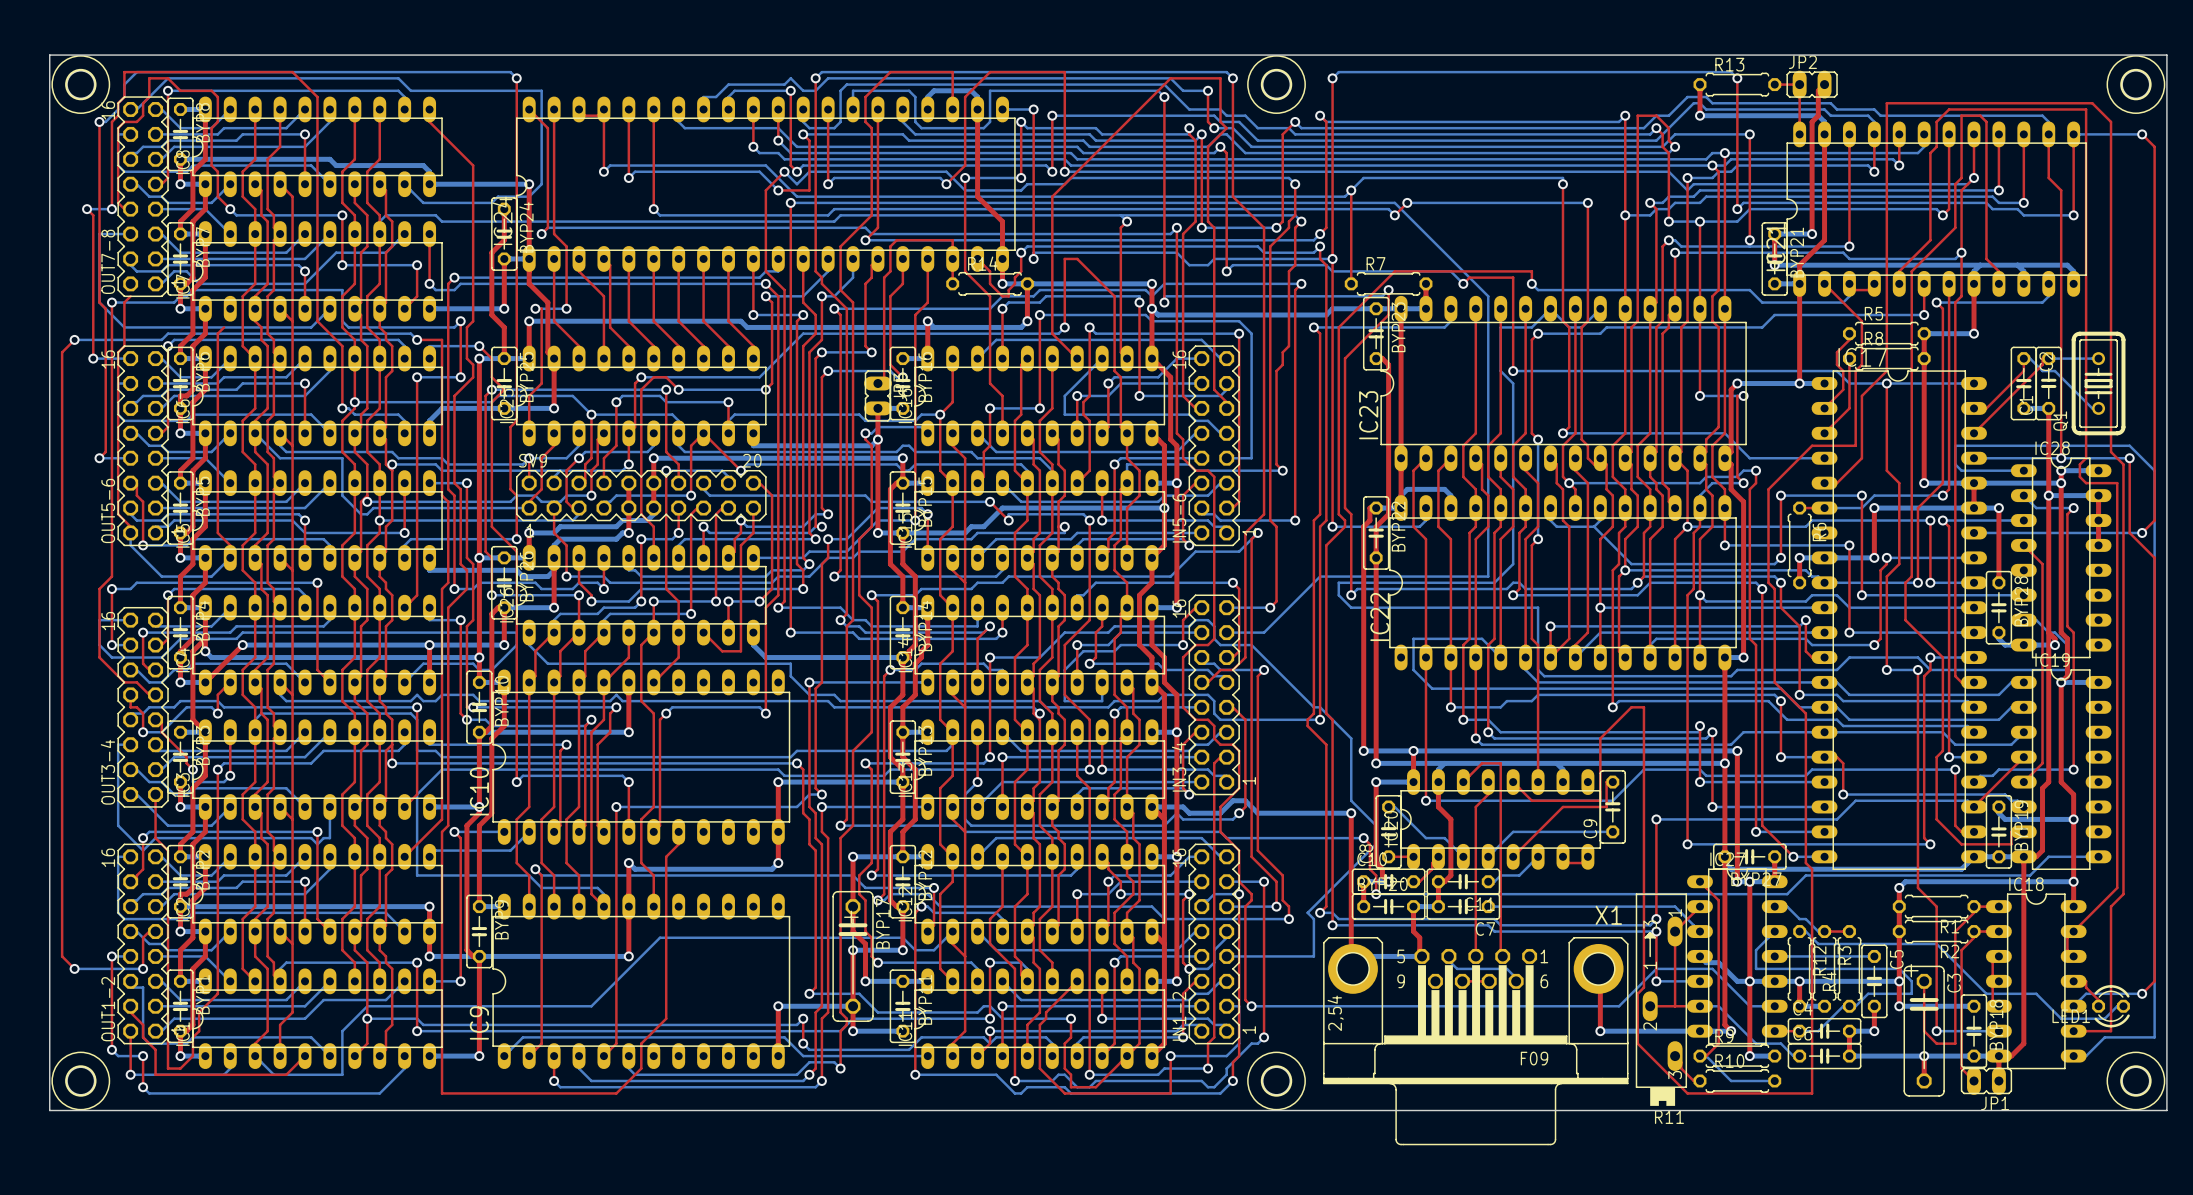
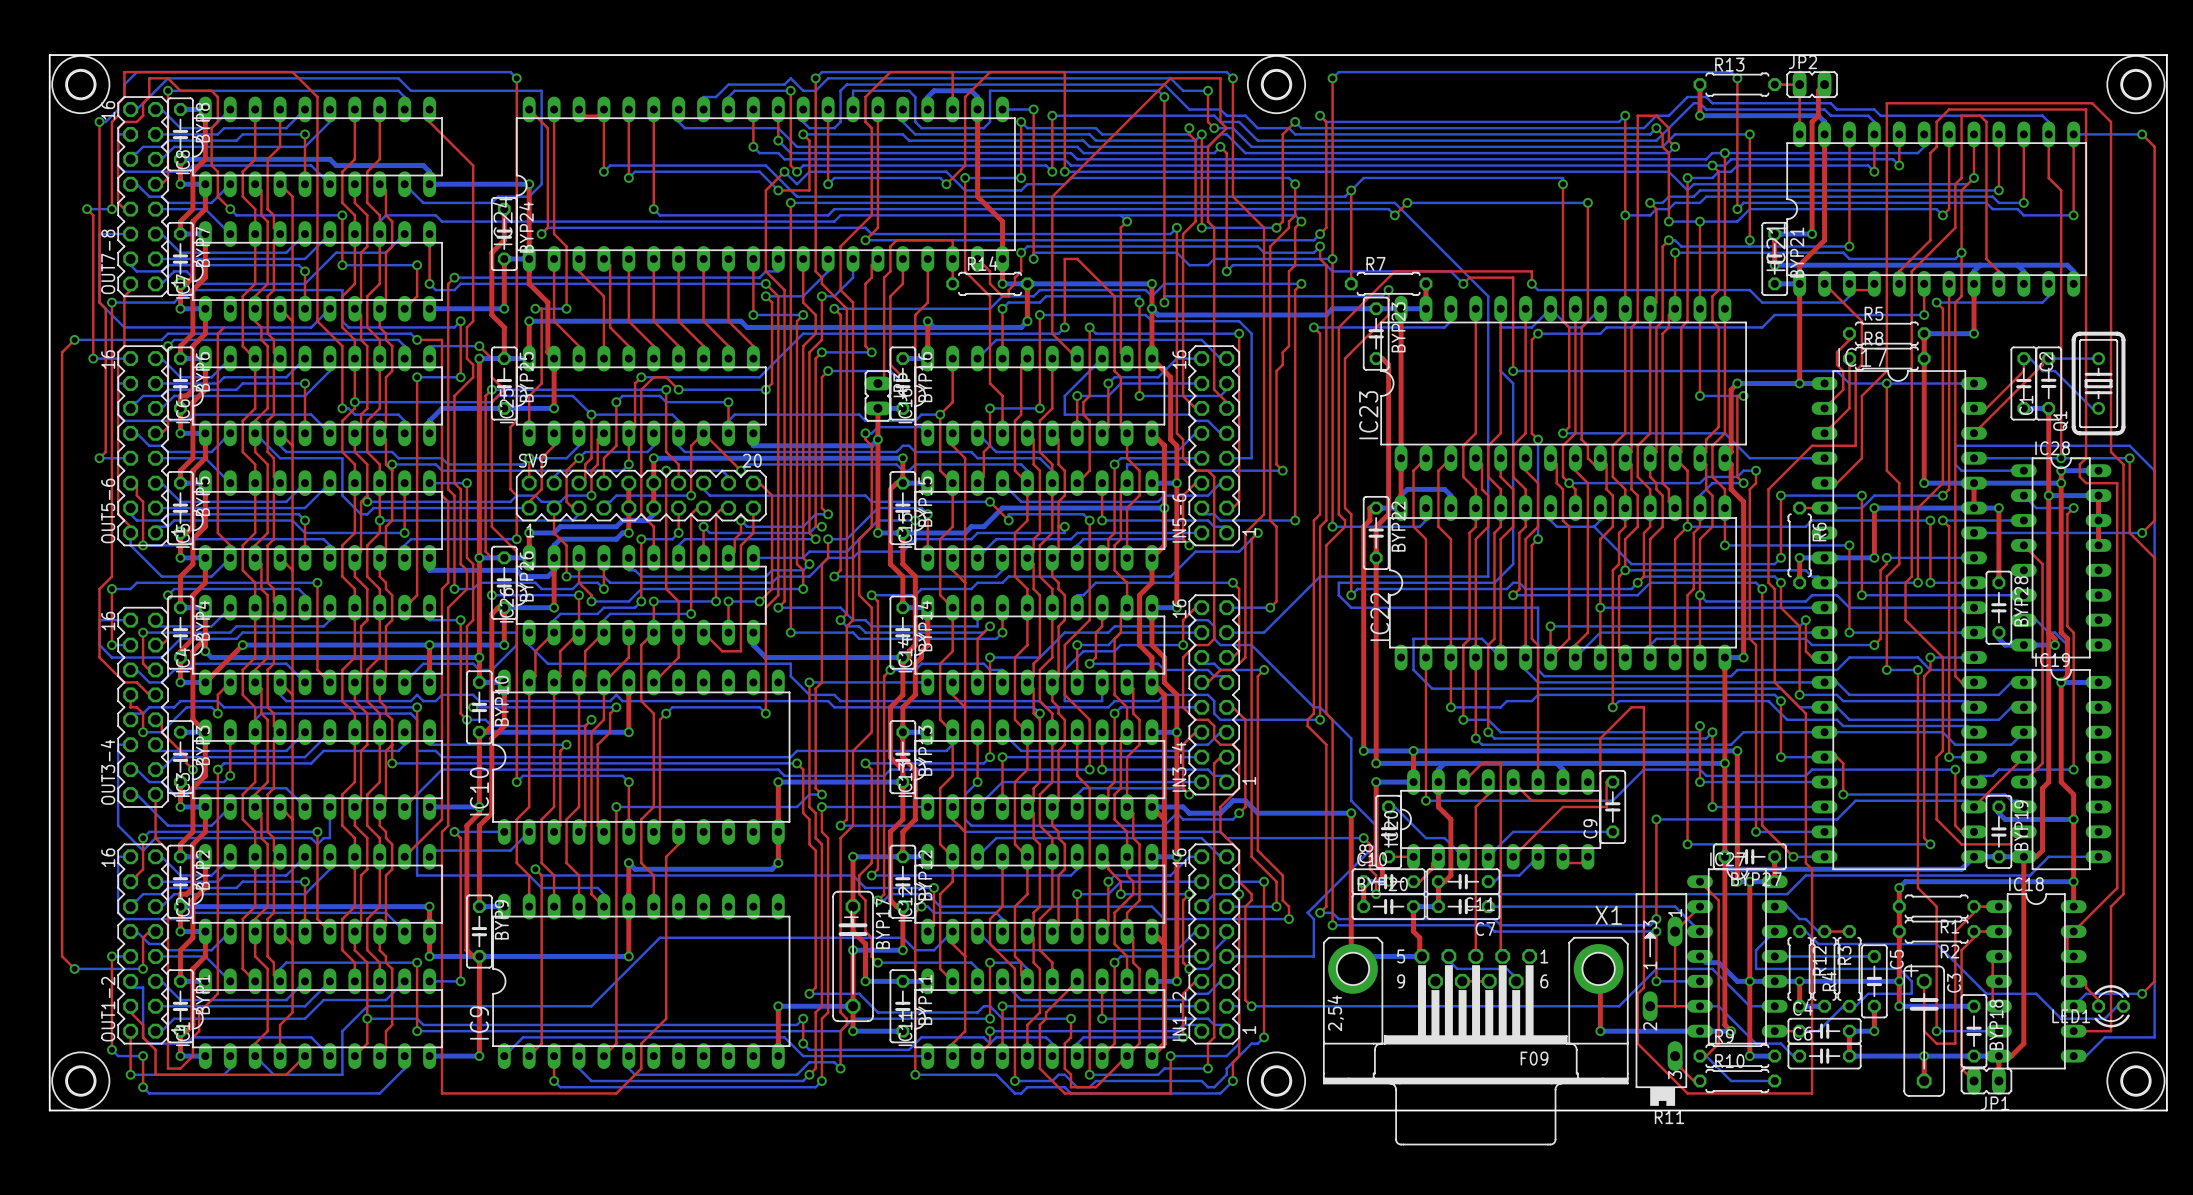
top track: (130, 296) (124, 302) -> (130, 283) (130, 290) (124, 296) (124, 302)

